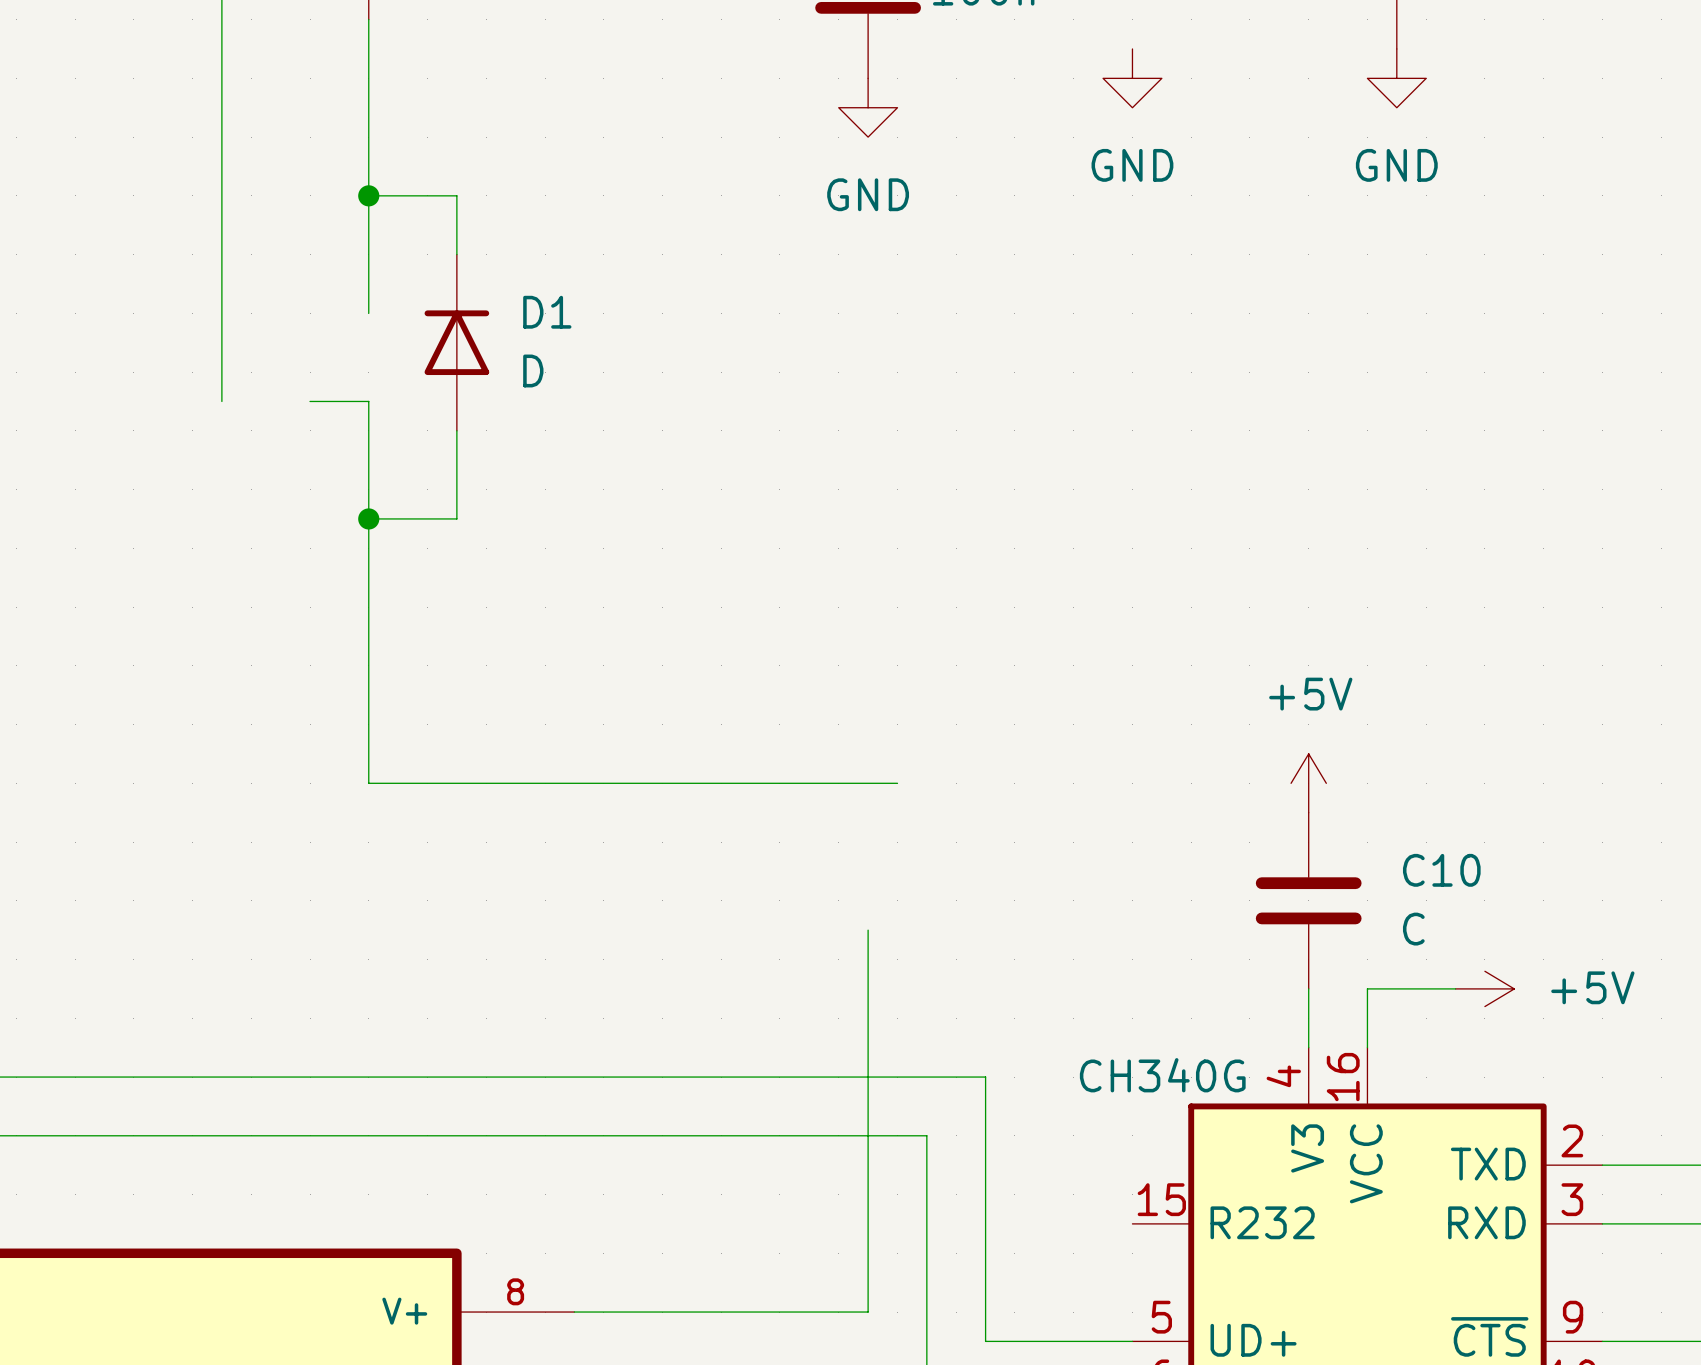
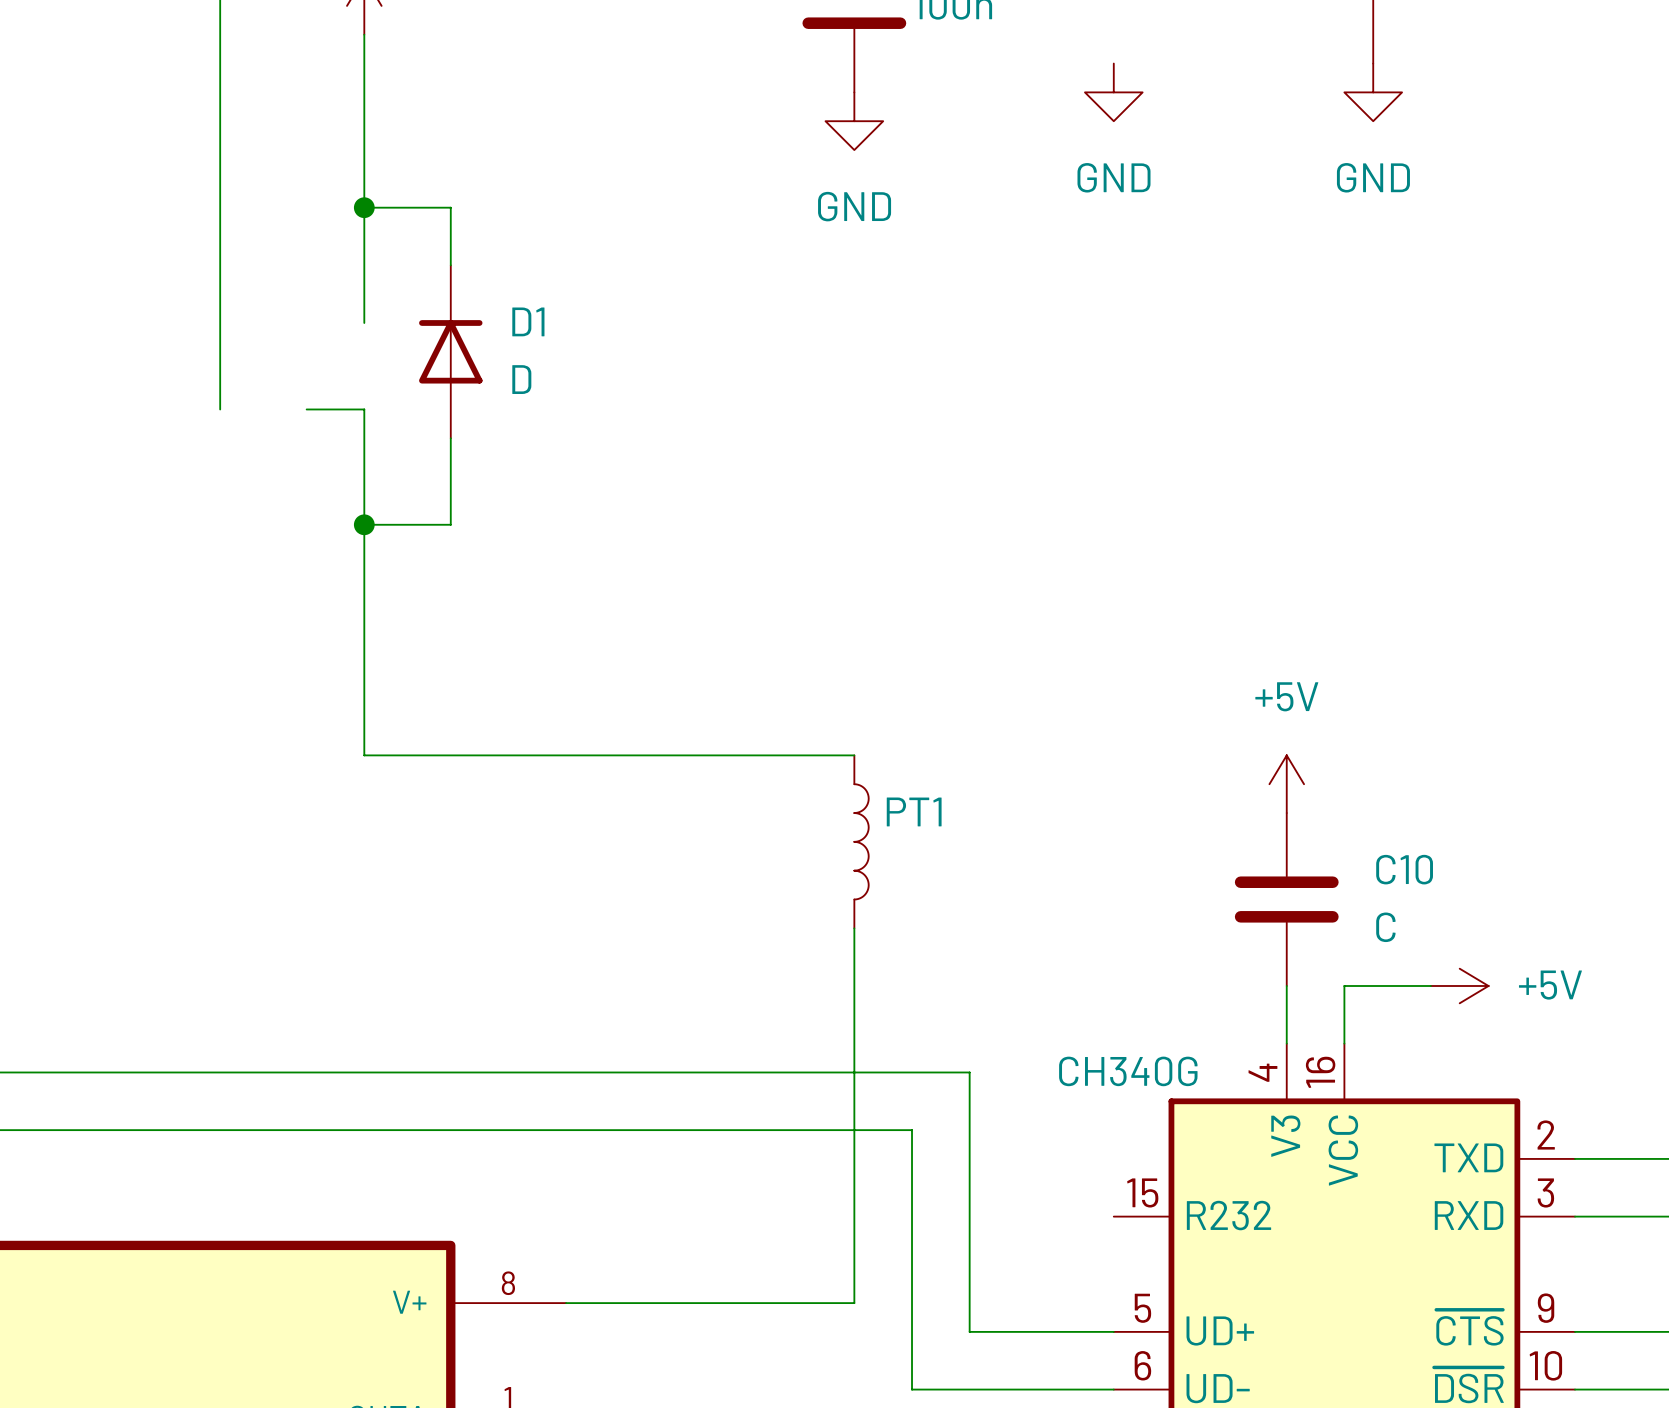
wire: (368, 753) (368, 783) (897, 783) -> (364, 755) (854, 755)
PT1: none -> (861, 841)

